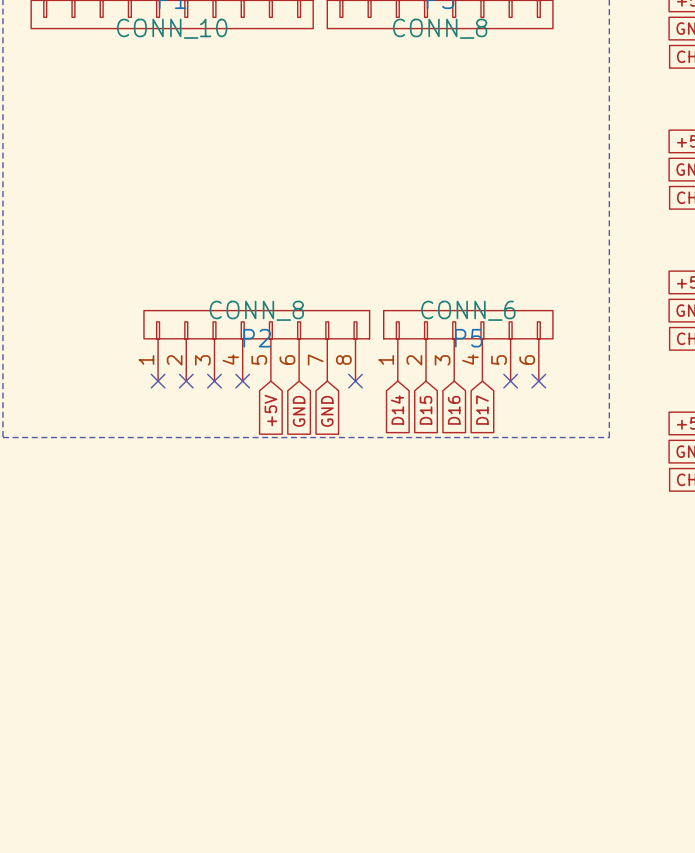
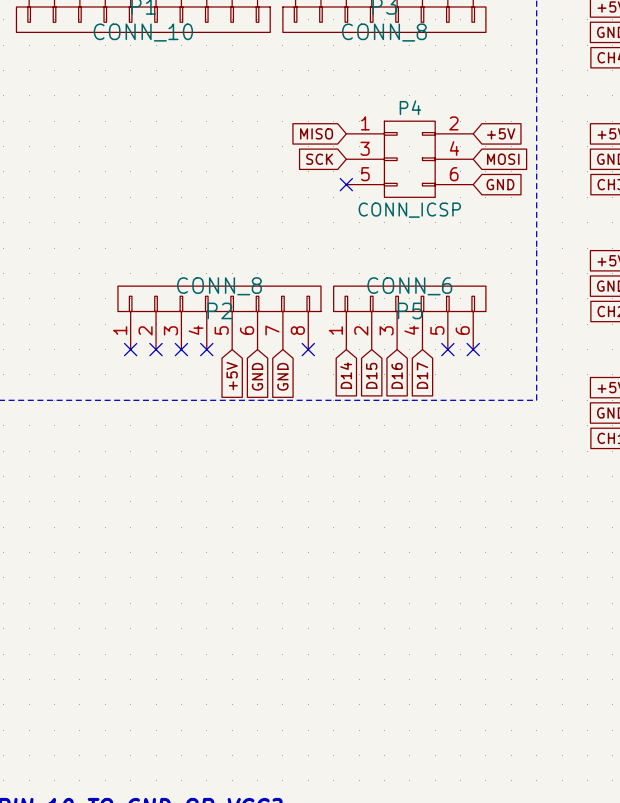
global label: none -> MISO (316, 133)
global label: none -> +5V (501, 133)
global label: none -> SCK (319, 159)
P4: none -> CONN_ICSP (409, 159)
global label: none -> MOSI (503, 159)
no-connect mark: none -> (346, 184)
global label: none -> GND (500, 184)

